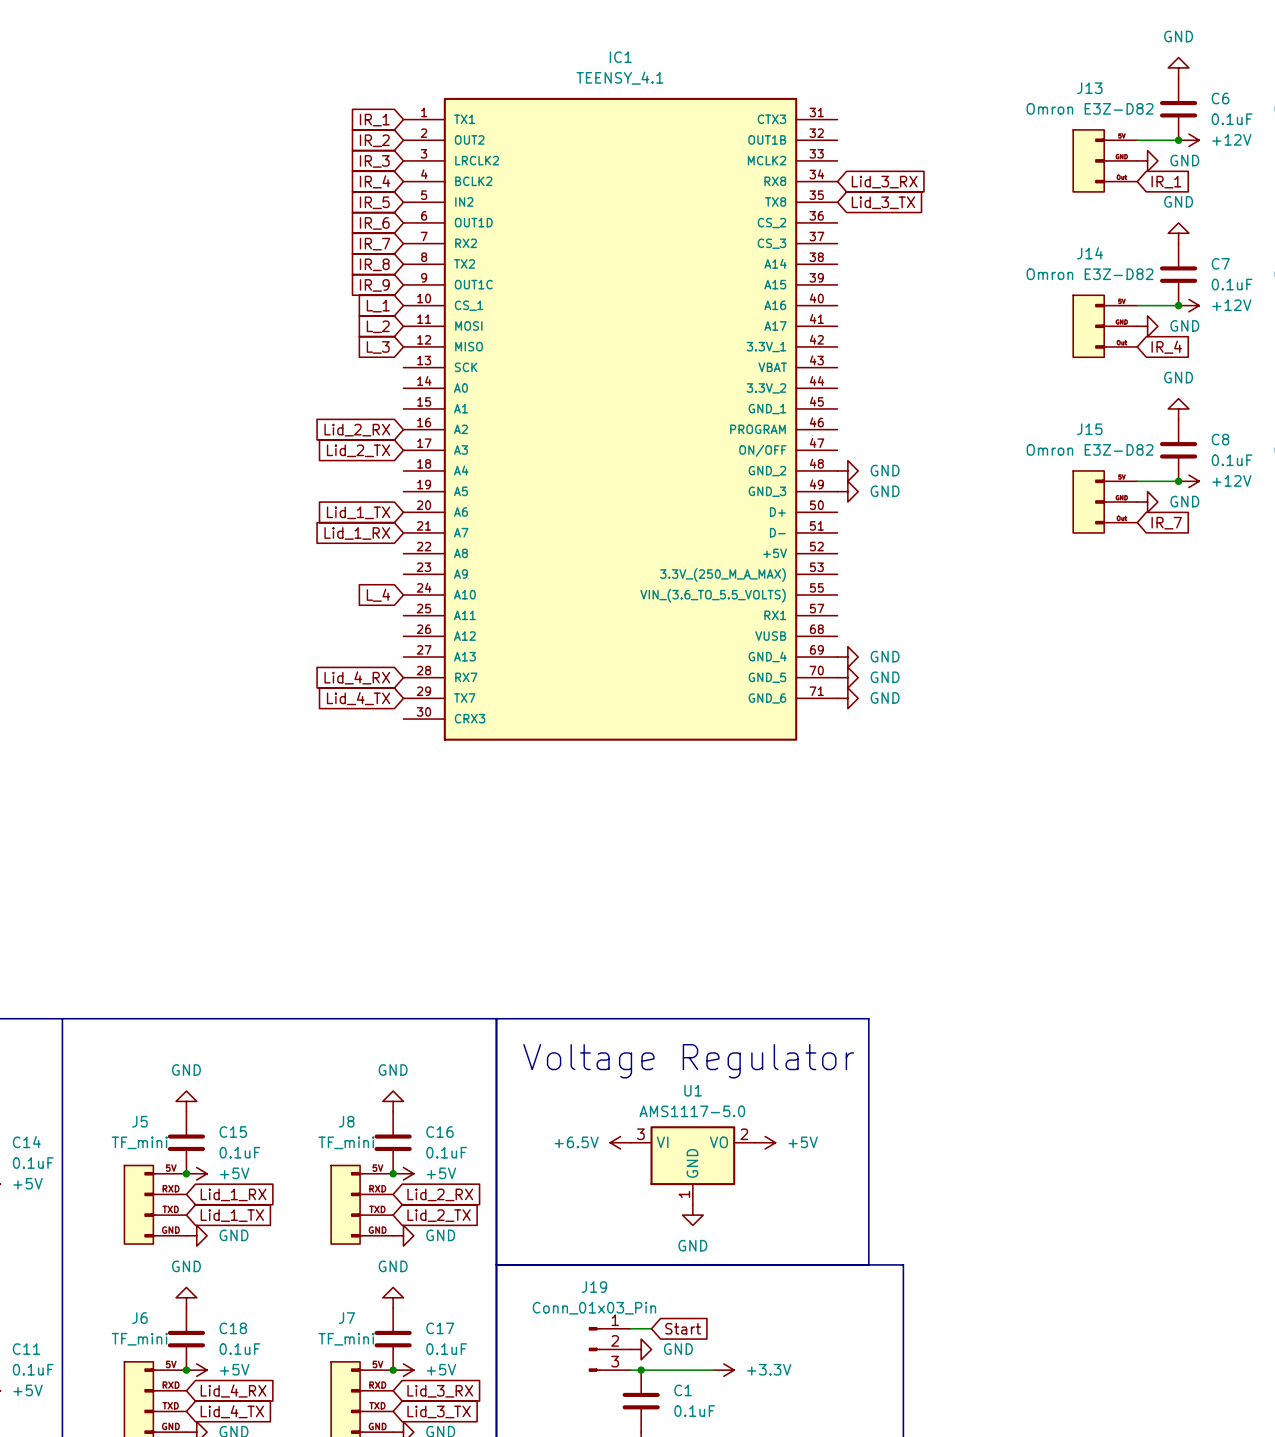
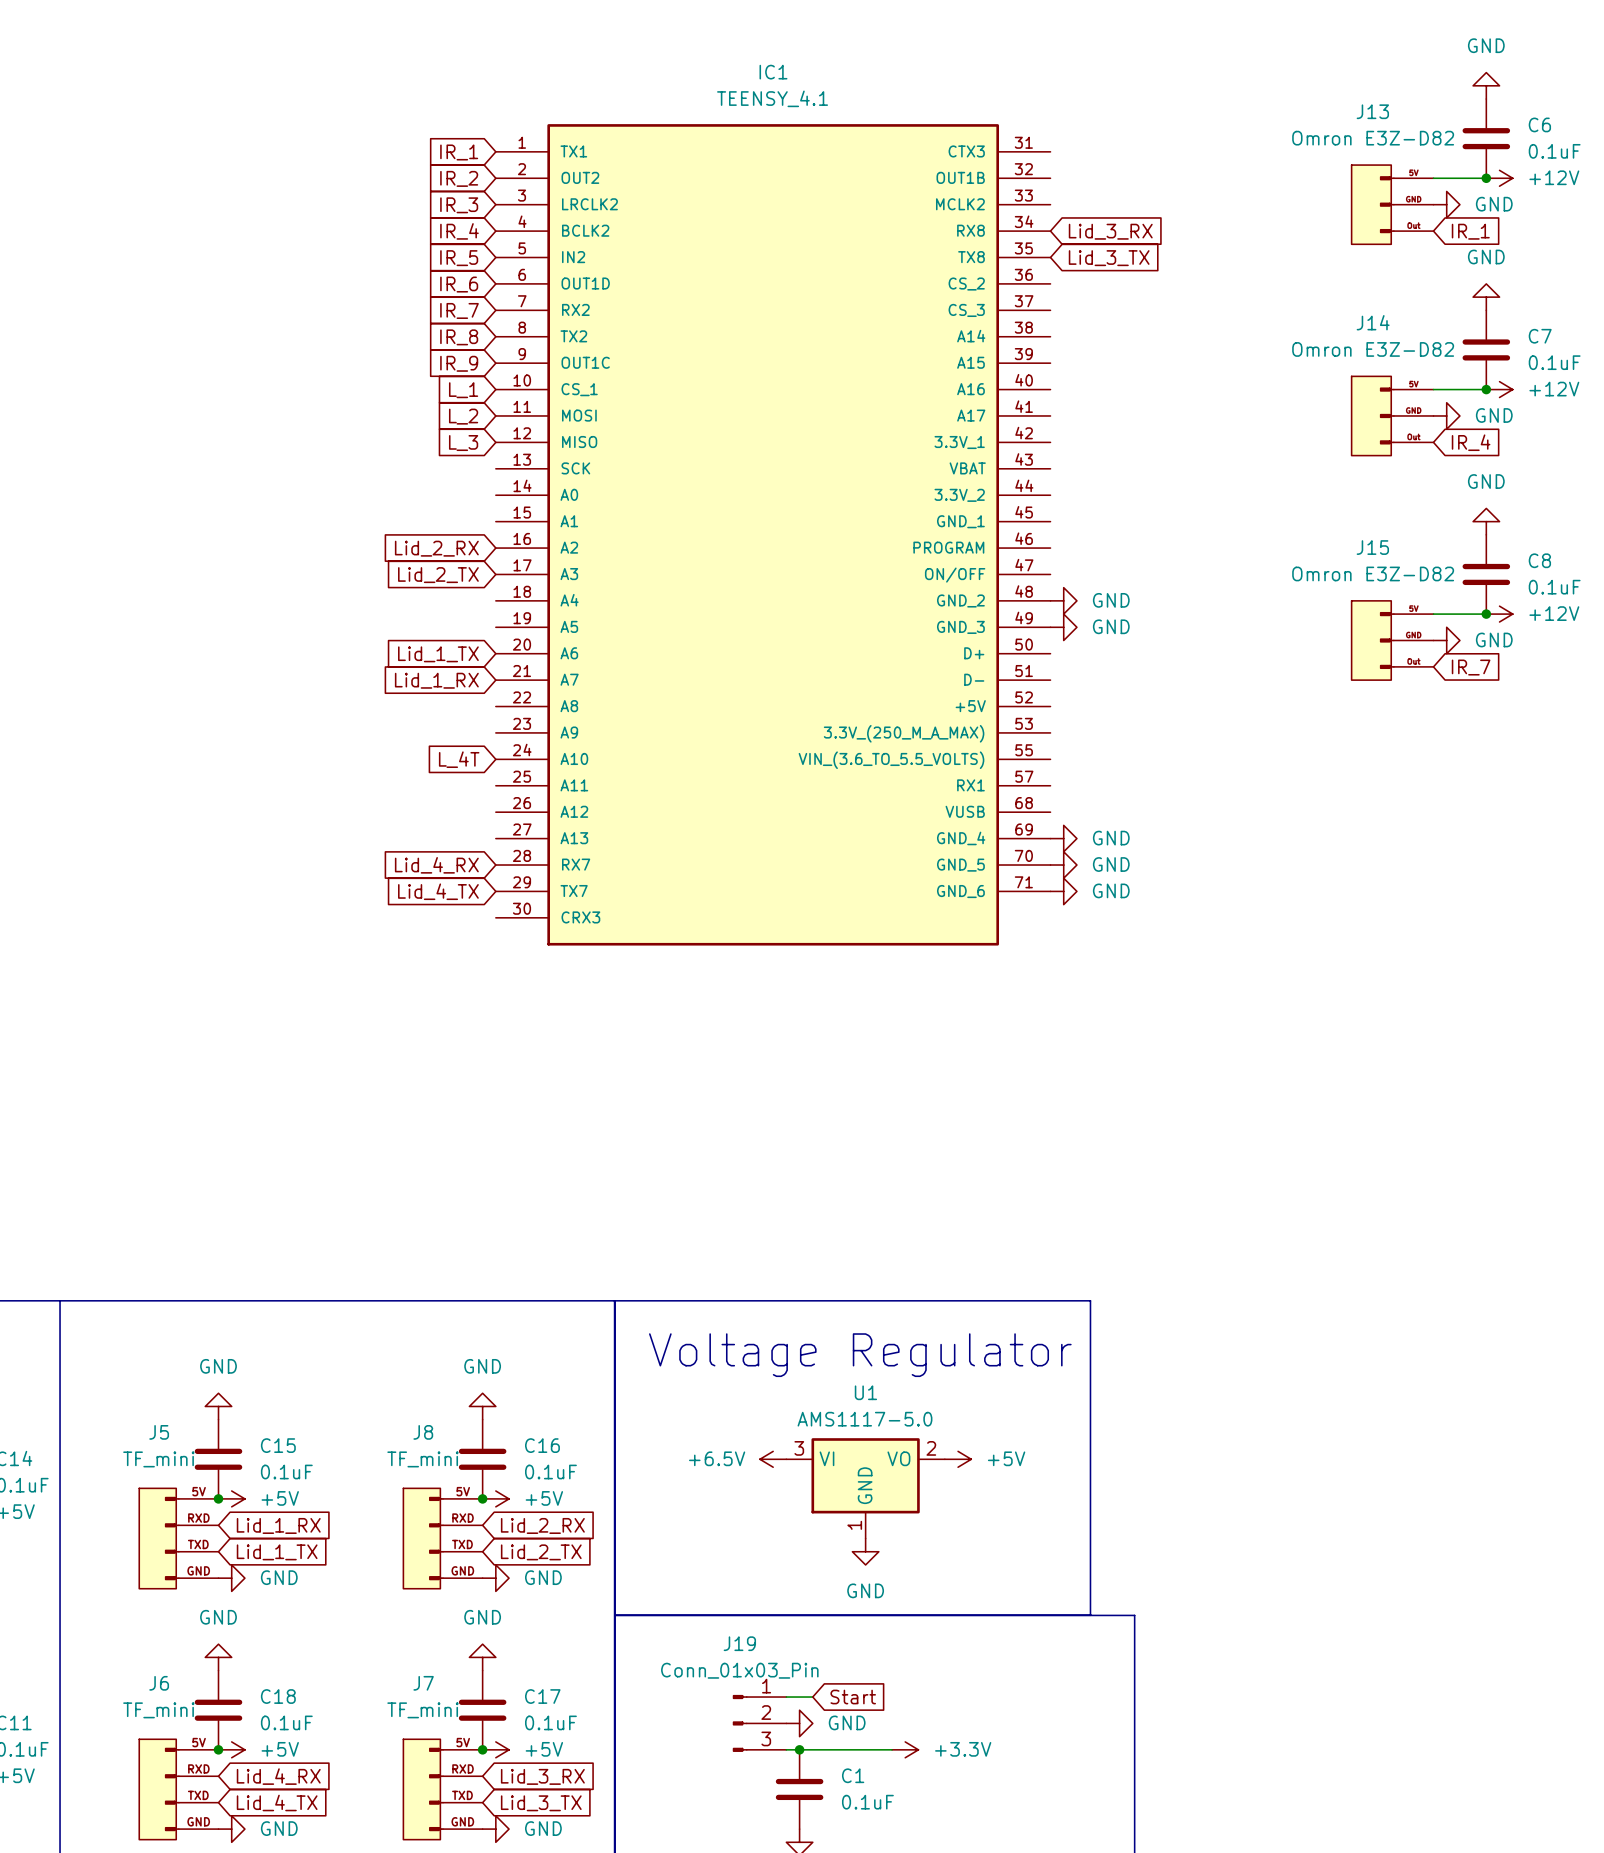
global label: L_4 (378, 595) -> L_4T (459, 759)

